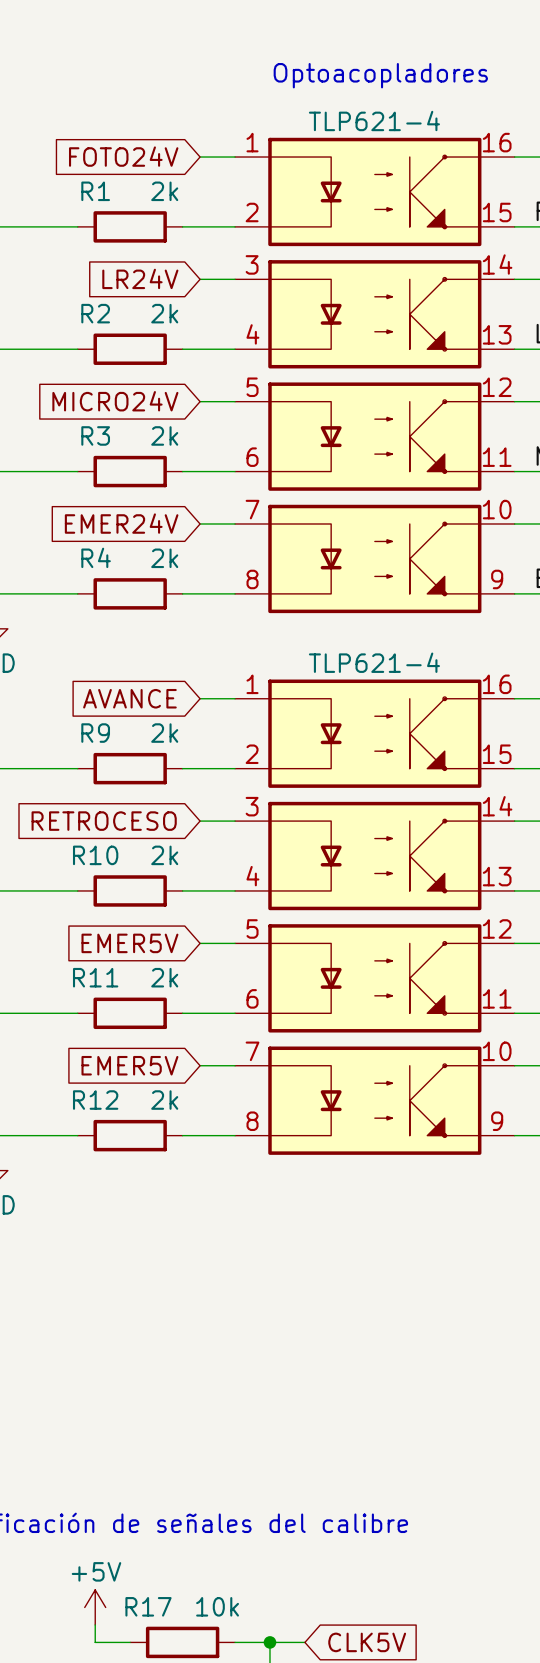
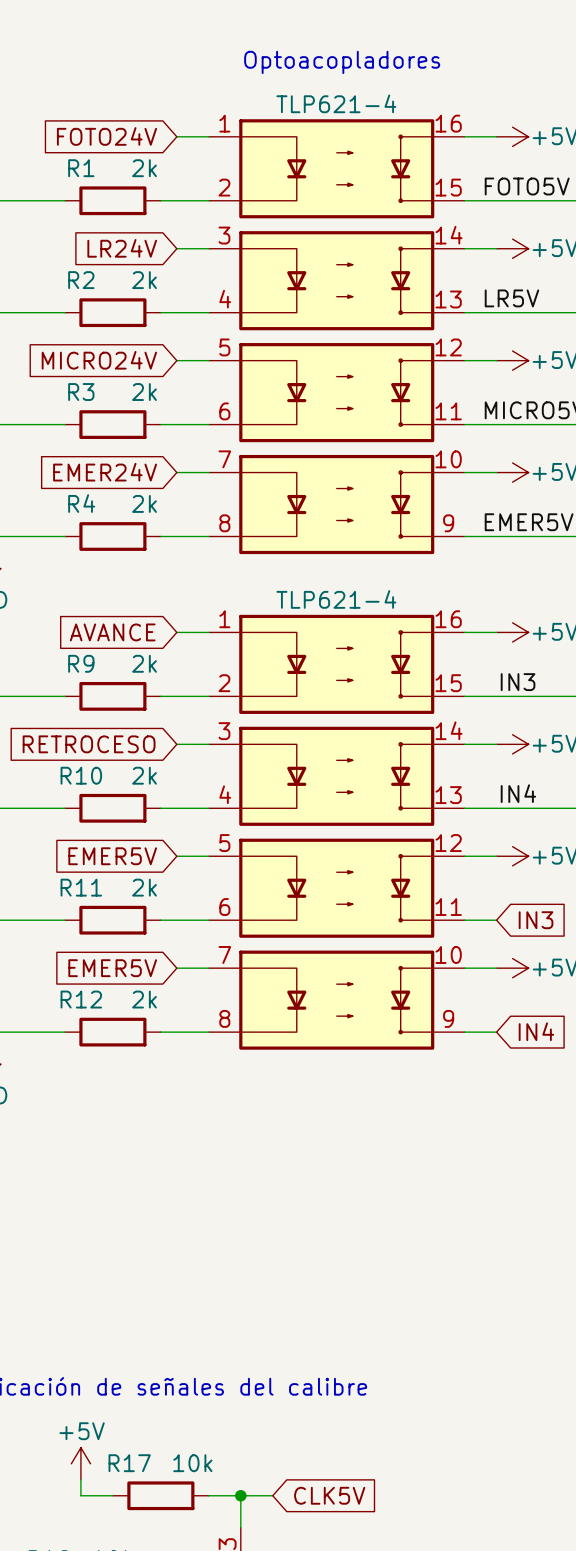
part symbol: [235, 137, 515, 247] -> [208, 119, 465, 219]
part symbol: [235, 260, 515, 369] -> [208, 231, 465, 331]
part symbol: [235, 382, 515, 491] -> [208, 343, 465, 443]
part symbol: [235, 504, 515, 614] -> [208, 454, 465, 555]
part symbol: [235, 679, 515, 788] -> [208, 614, 465, 714]
part symbol: [235, 801, 515, 911] -> [208, 726, 465, 826]
part symbol: [235, 924, 515, 1033] -> [208, 838, 465, 938]
part symbol: [235, 1046, 515, 1155] -> [208, 950, 465, 1050]

